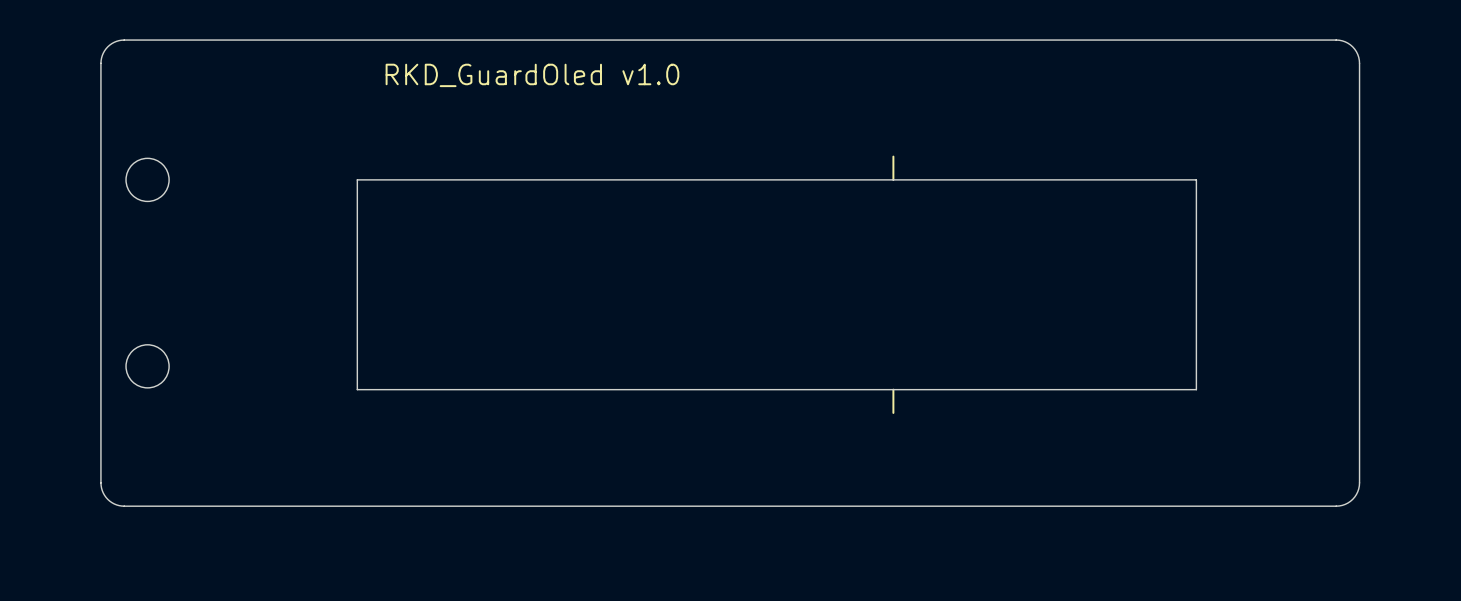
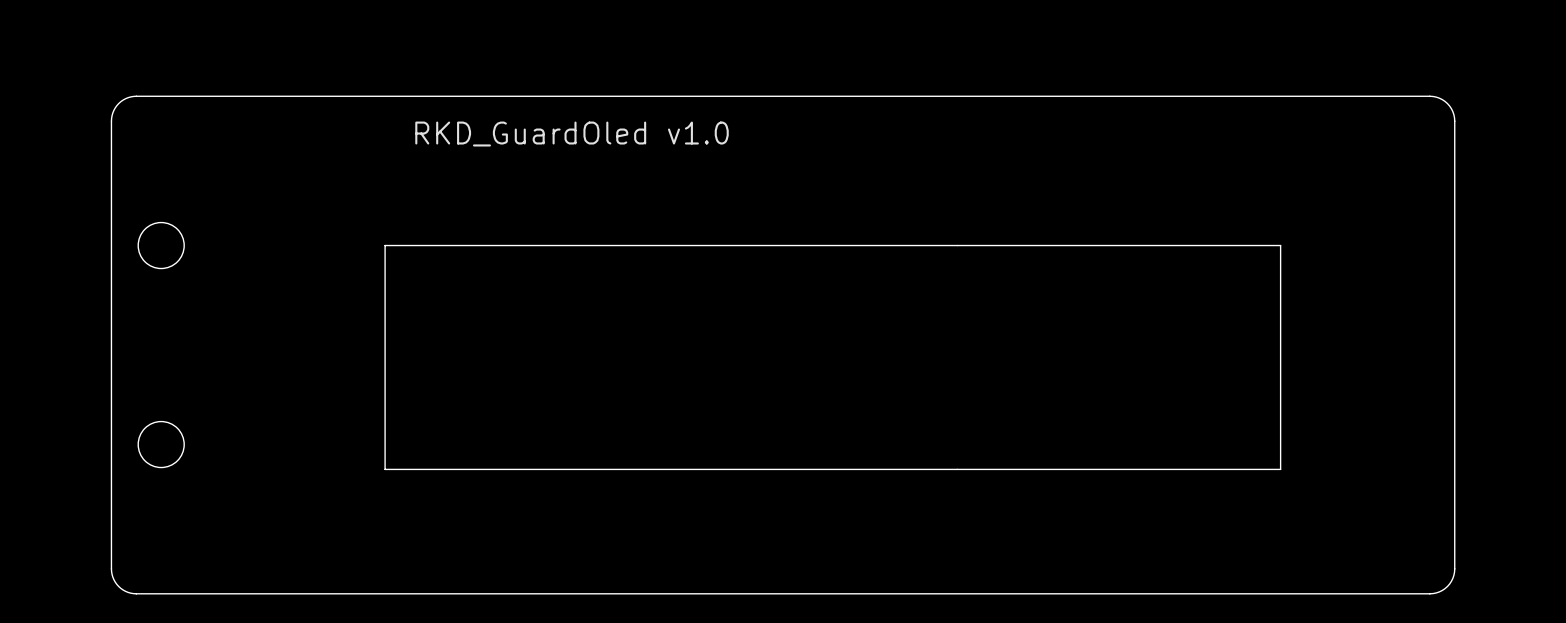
line: (893, 156) (893, 179) -> none
line: (893, 389) (893, 412) -> none

